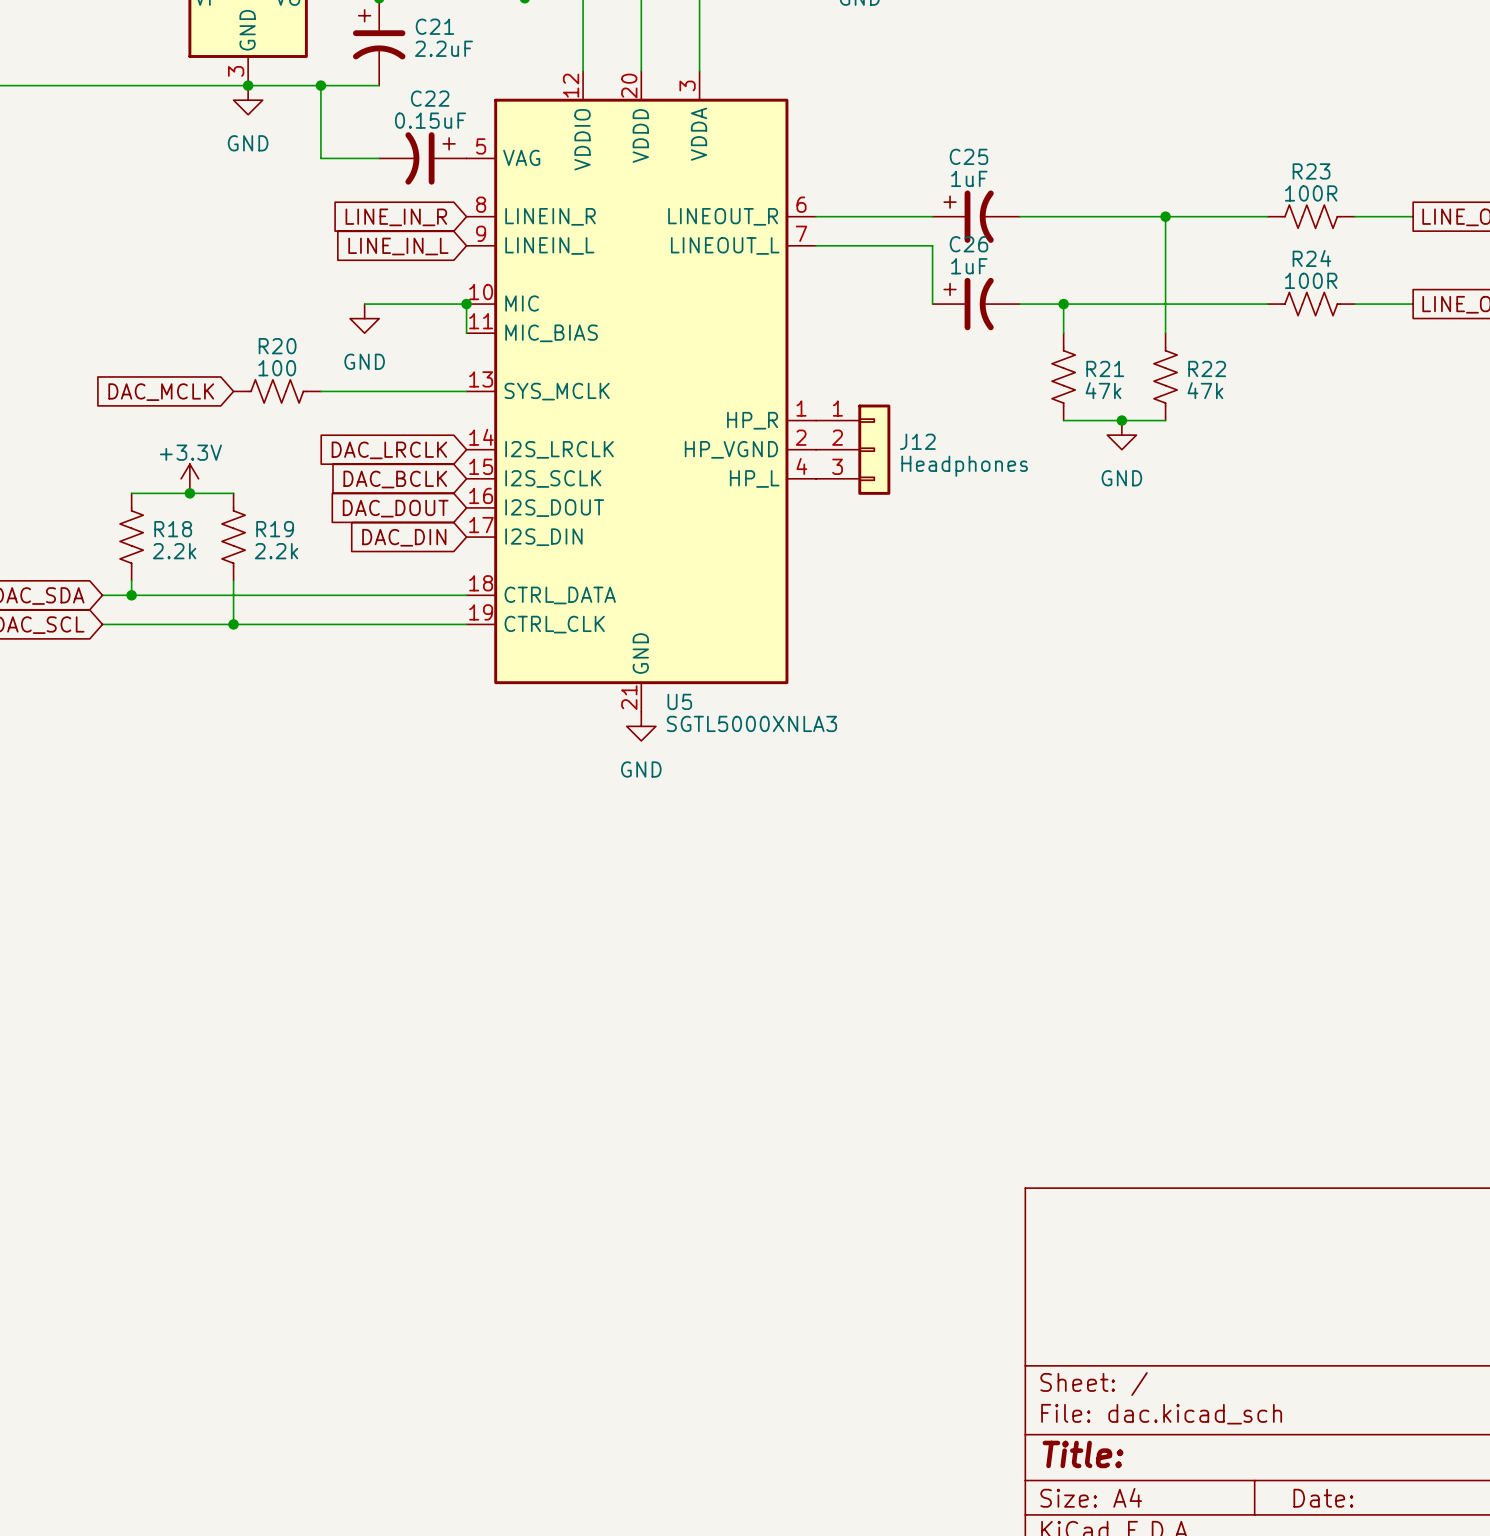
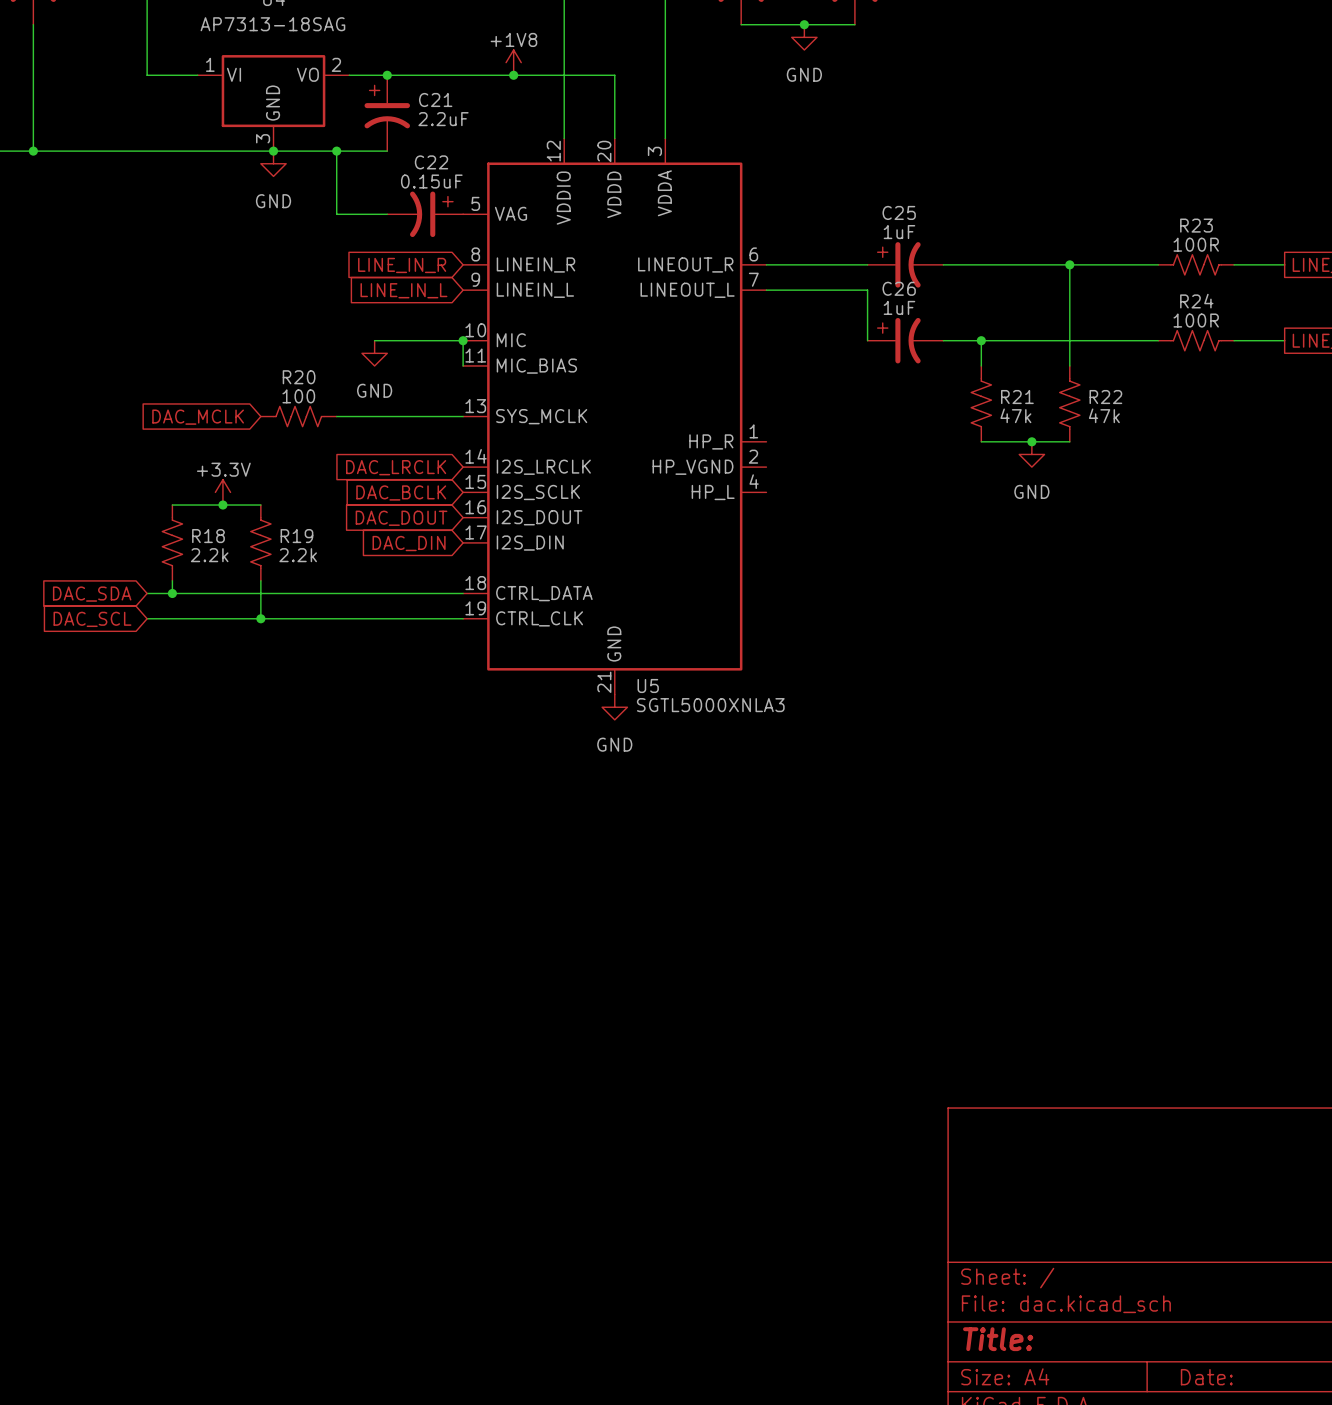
J12: Headphones (853, 449) -> none

